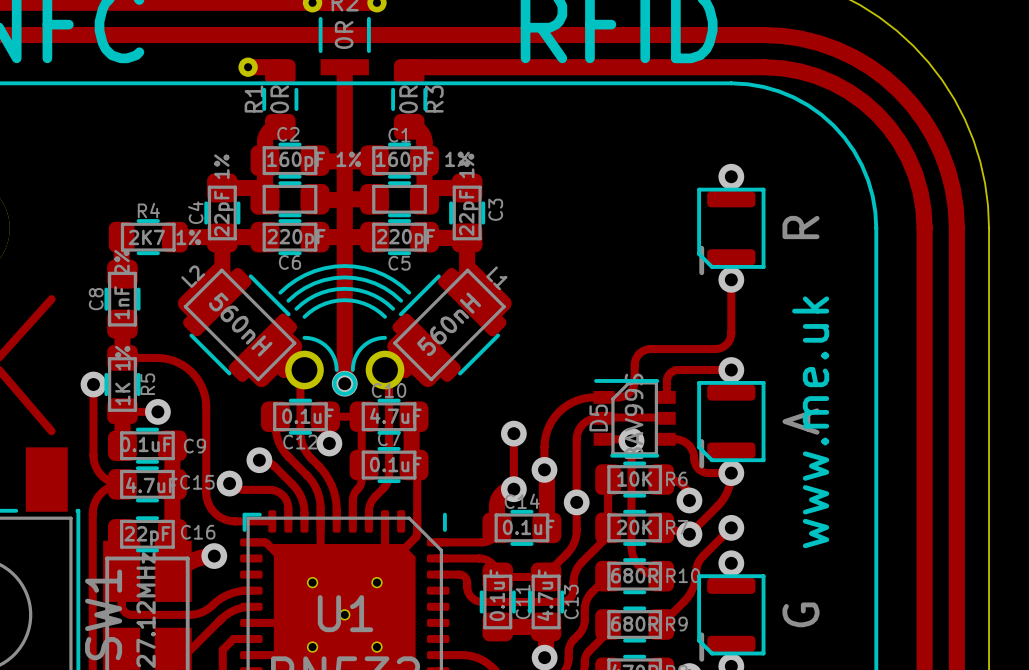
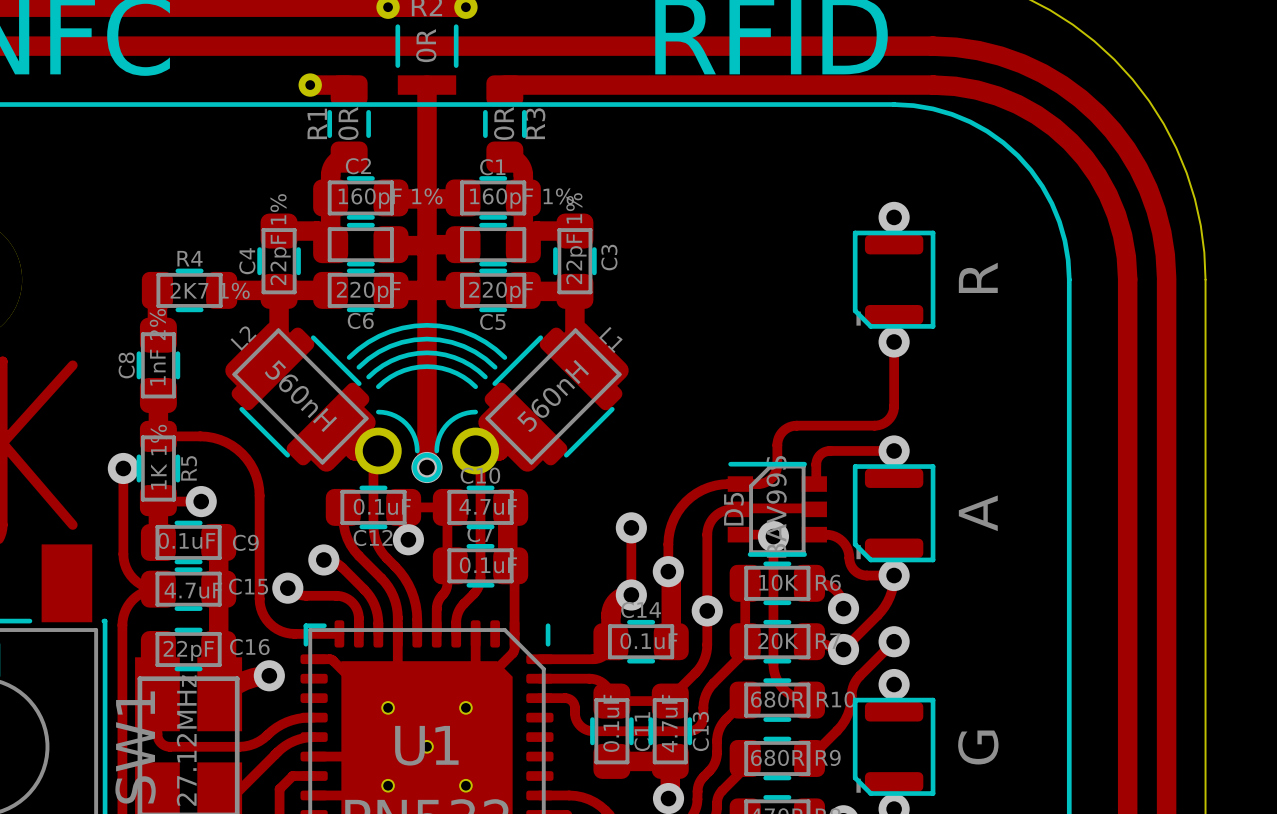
text: www.me.uk (810, 422) -> none

